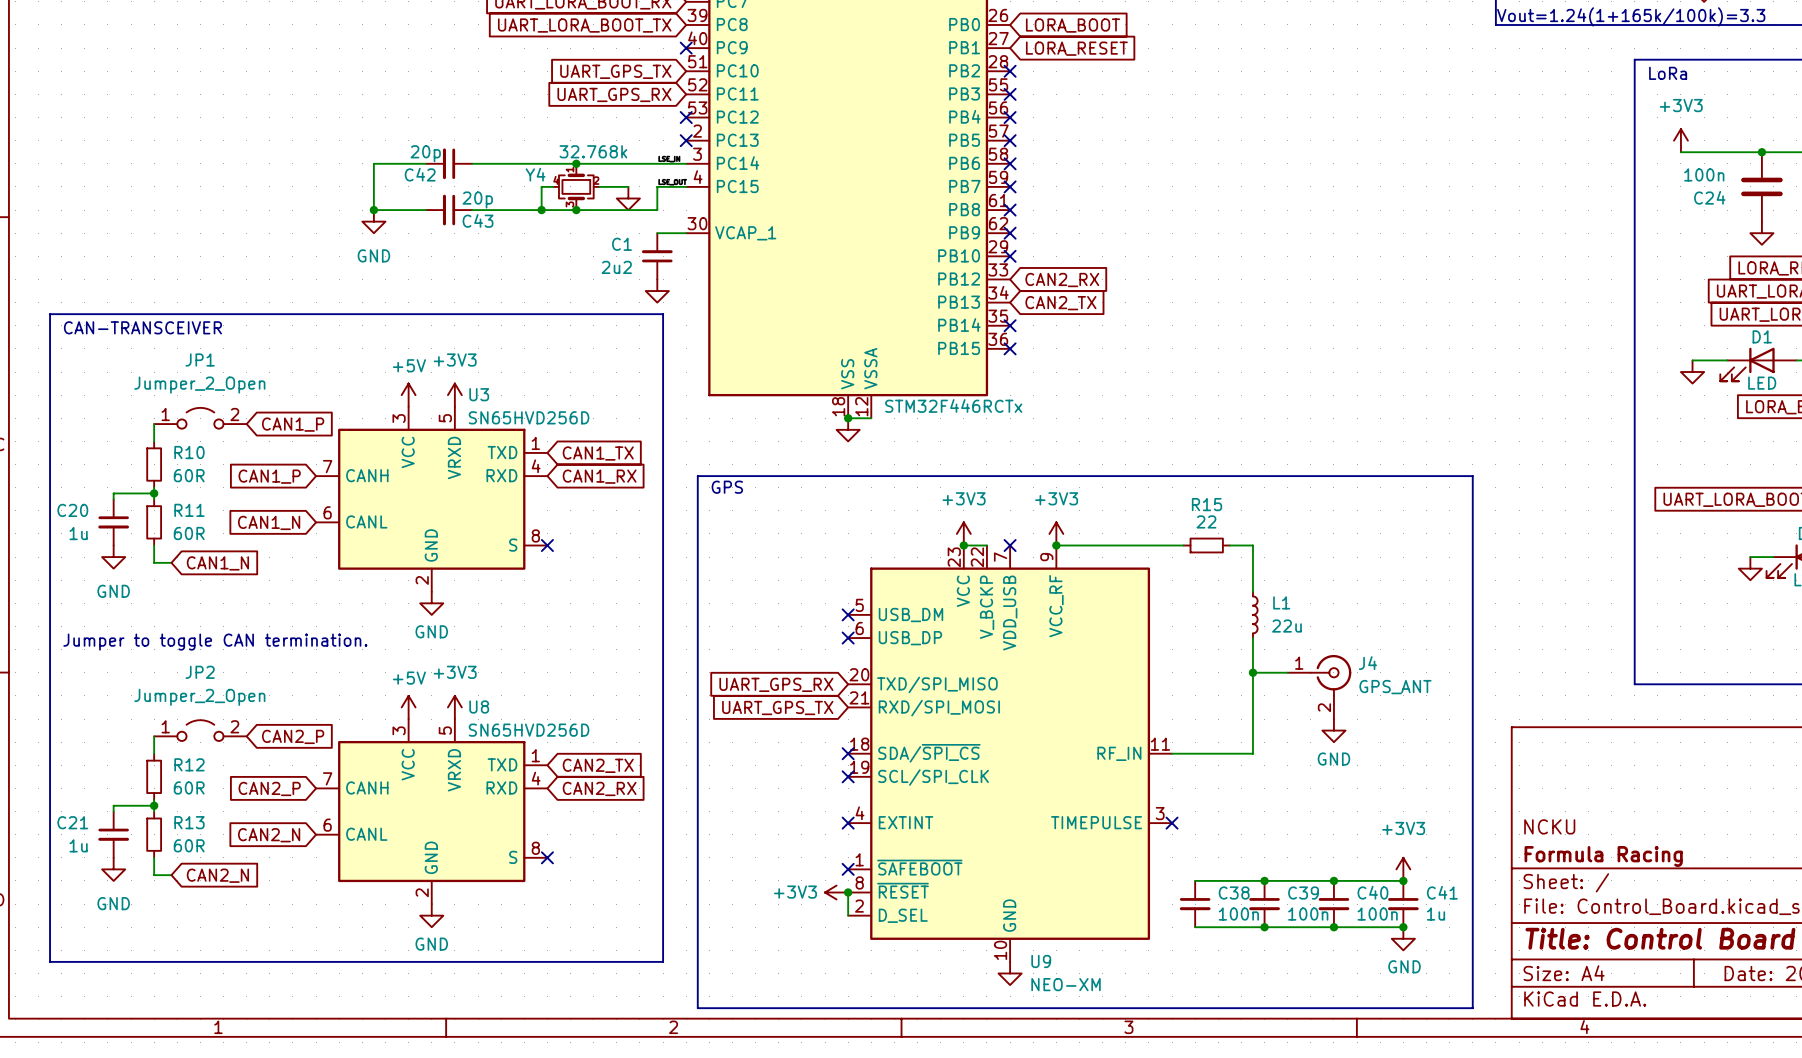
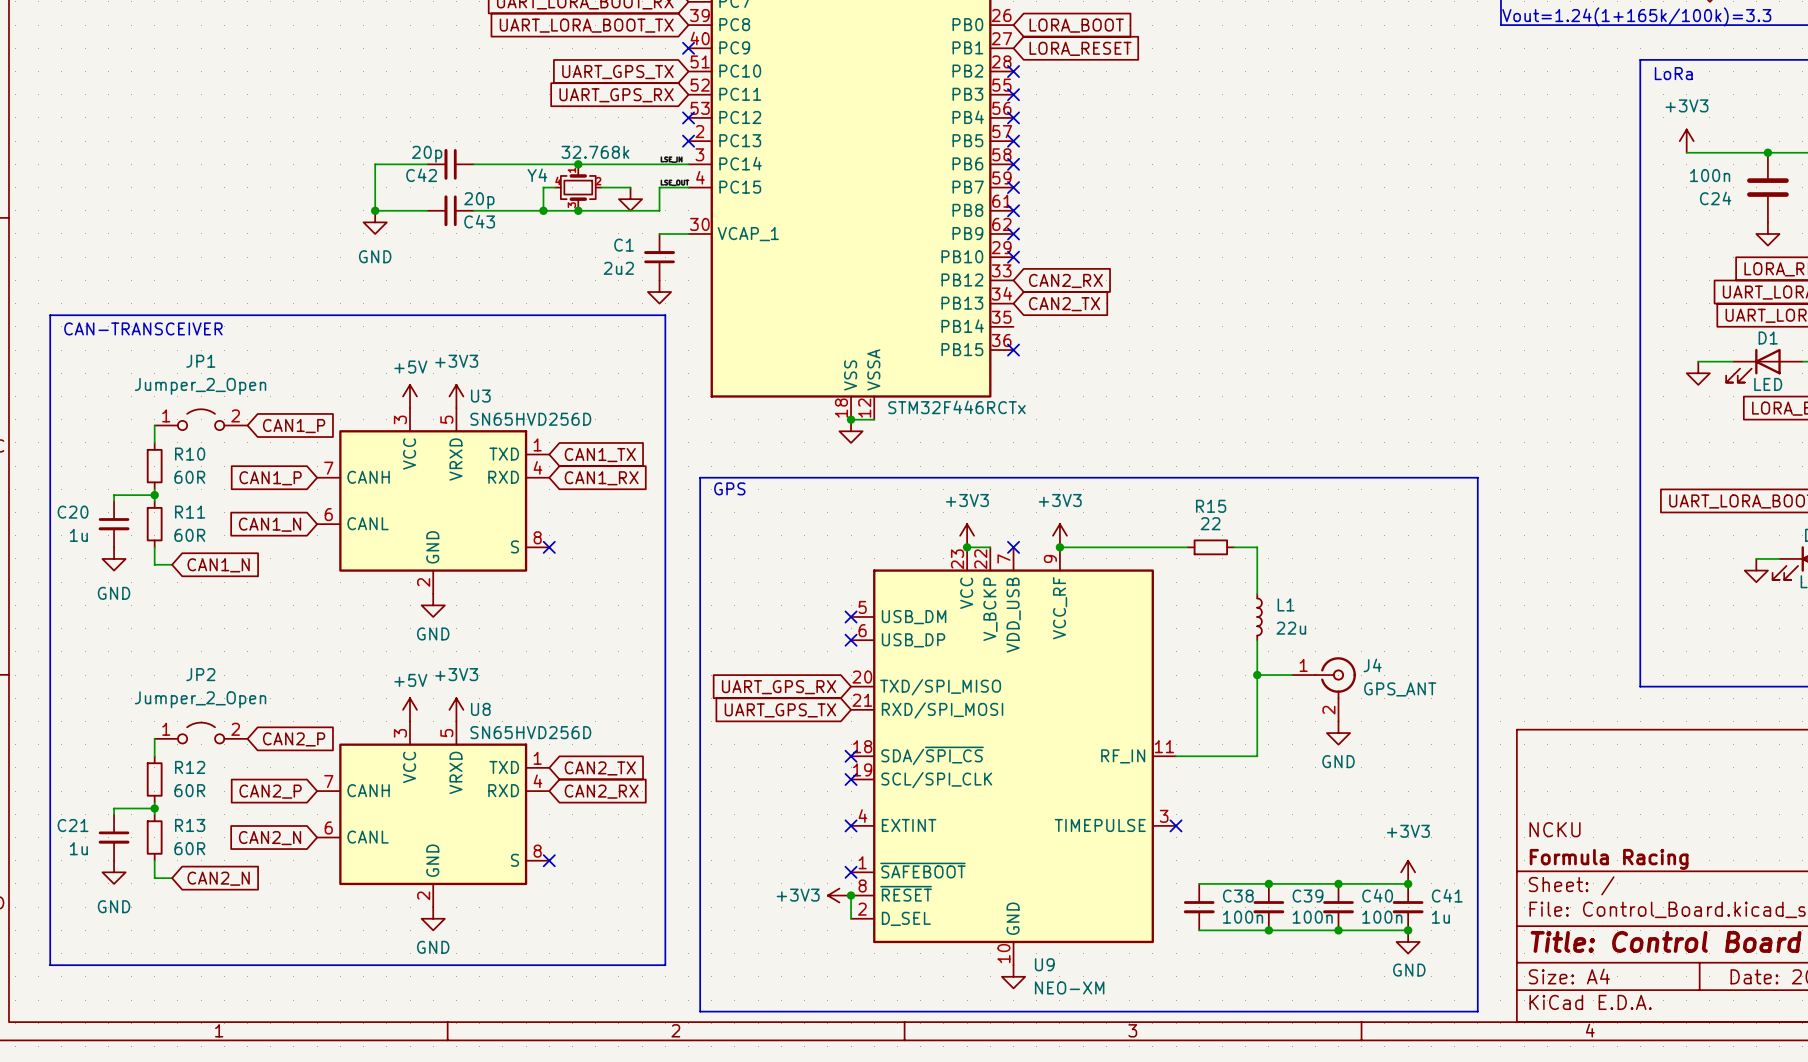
no-connect mark: (1010, 325) -> none
text: Jumper to toggle CAN termination. (215, 642) -> none

